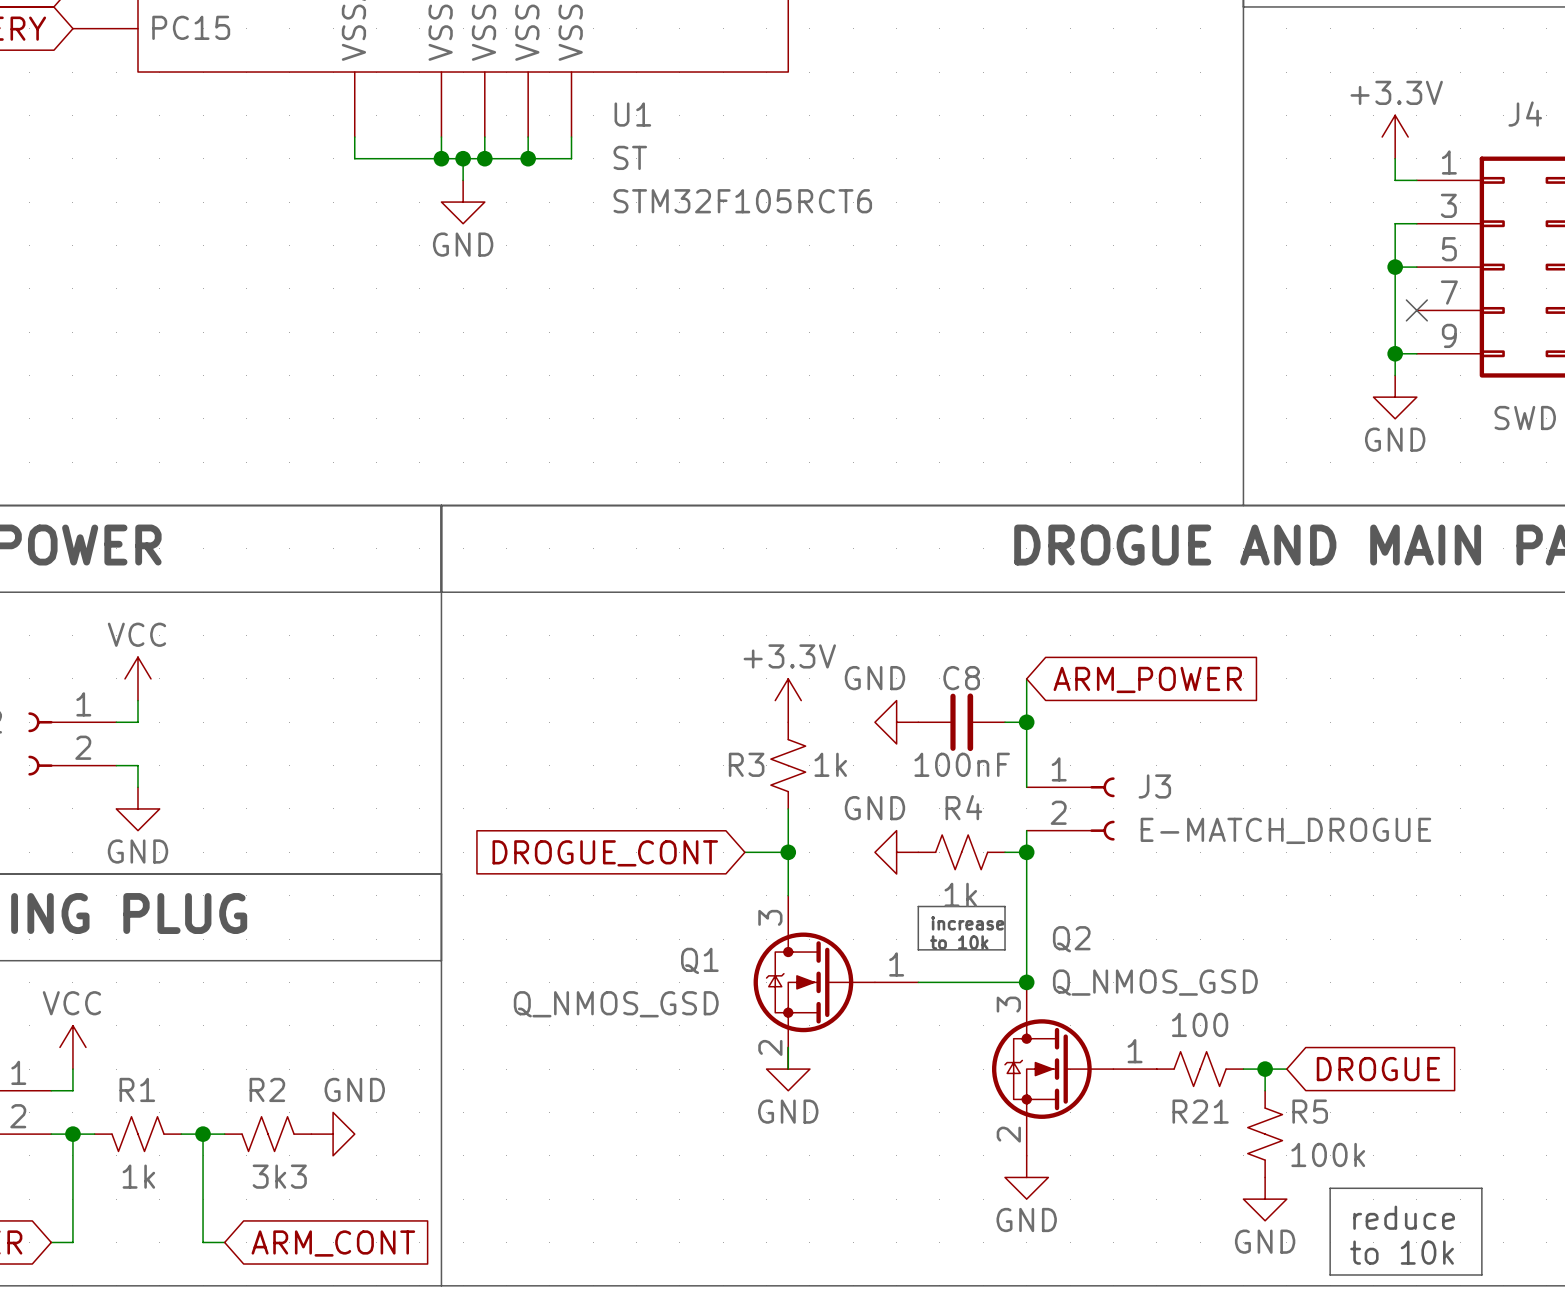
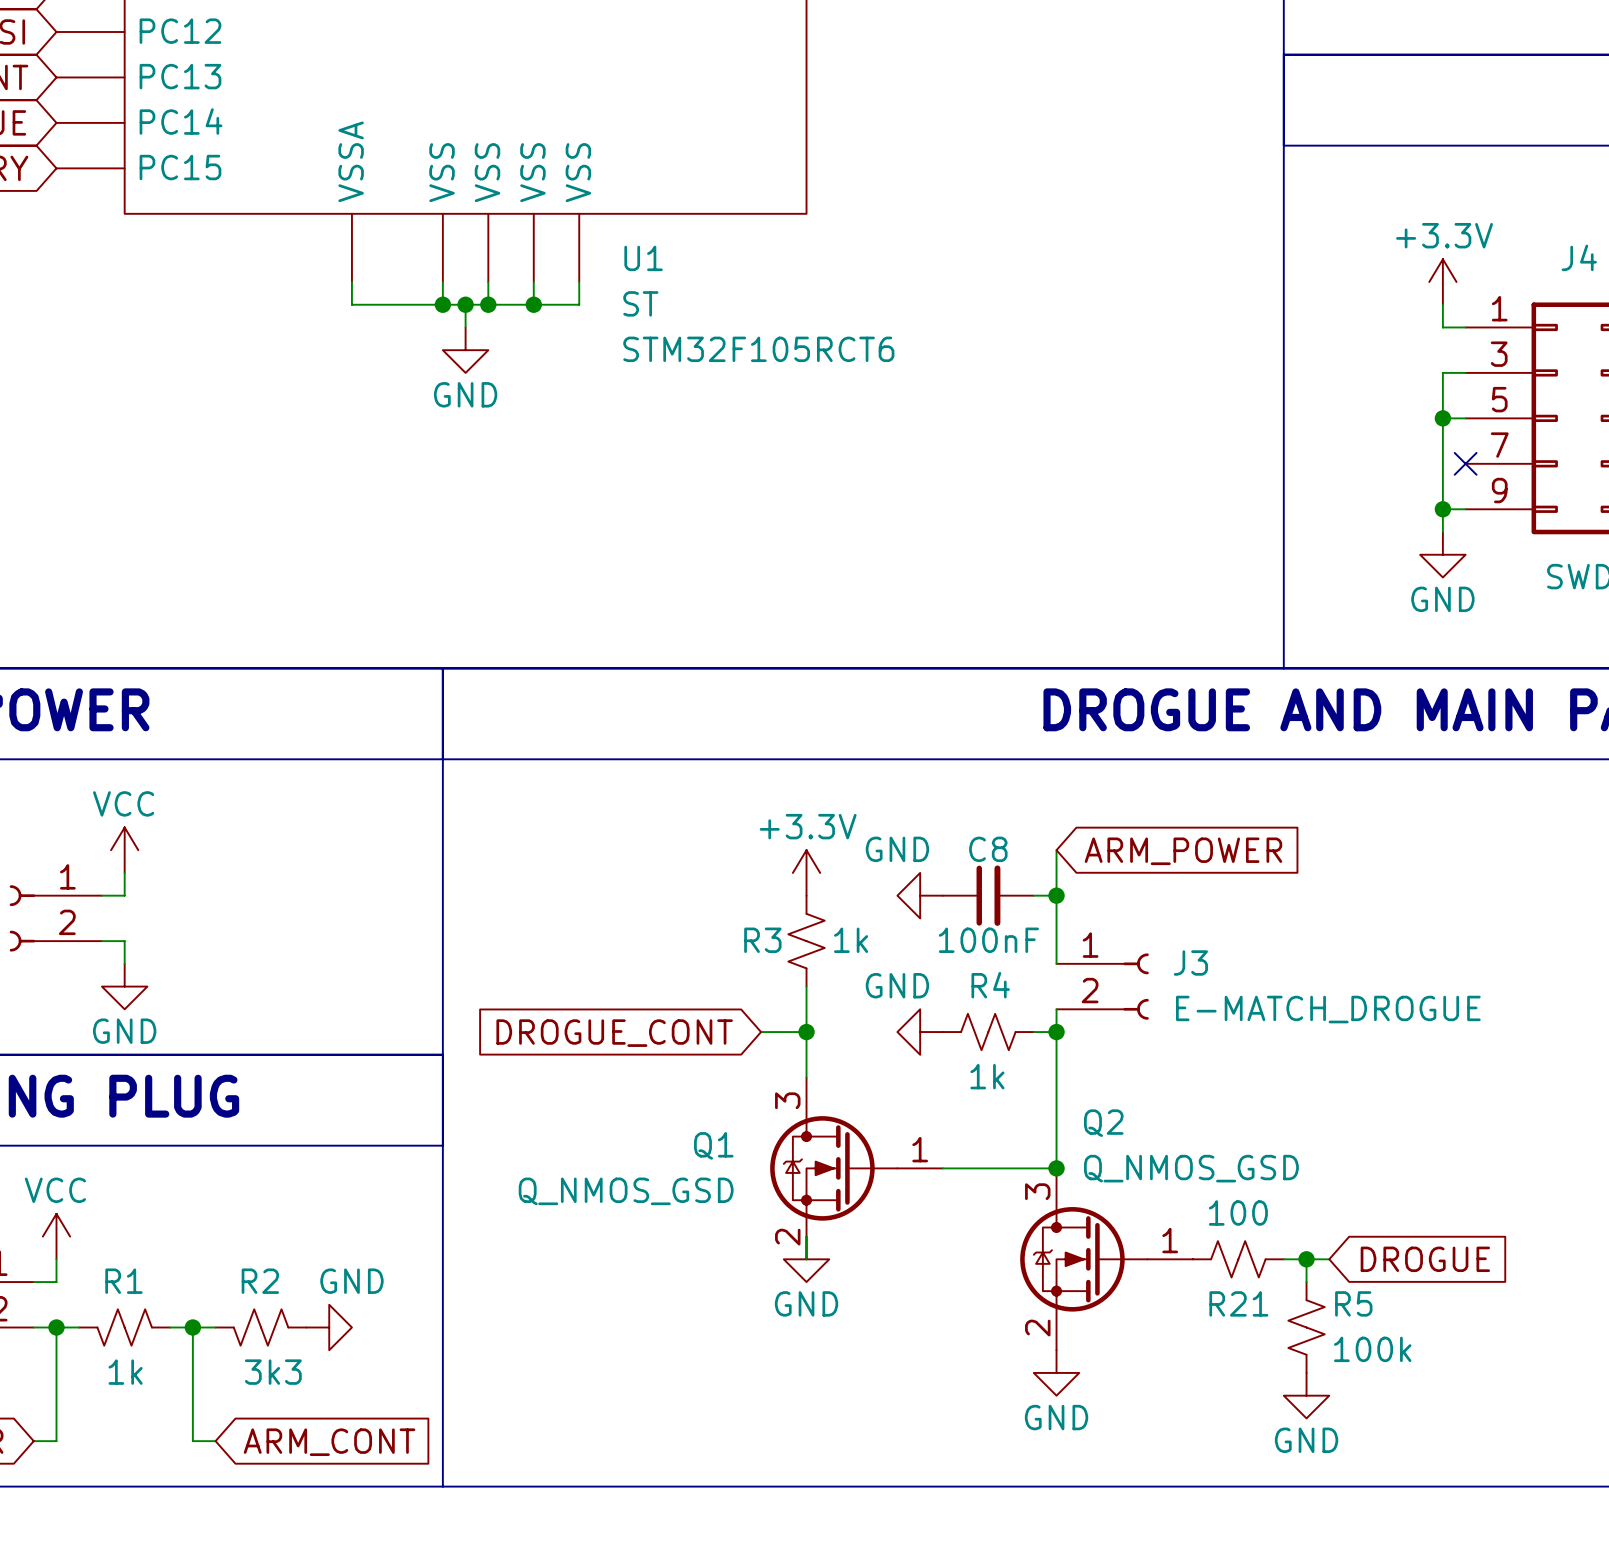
line: (918, 906) (1005, 906) (1005, 949) (918, 949) (918, 906) -> none
text: increase (967, 923) -> none
text: to 10k (959, 942) -> none
line: (1330, 1188) (1481, 1188) (1481, 1274) (1330, 1274) (1330, 1188) -> none
text: reduce (1404, 1217) -> none
text: to 10k (1402, 1252) -> none

